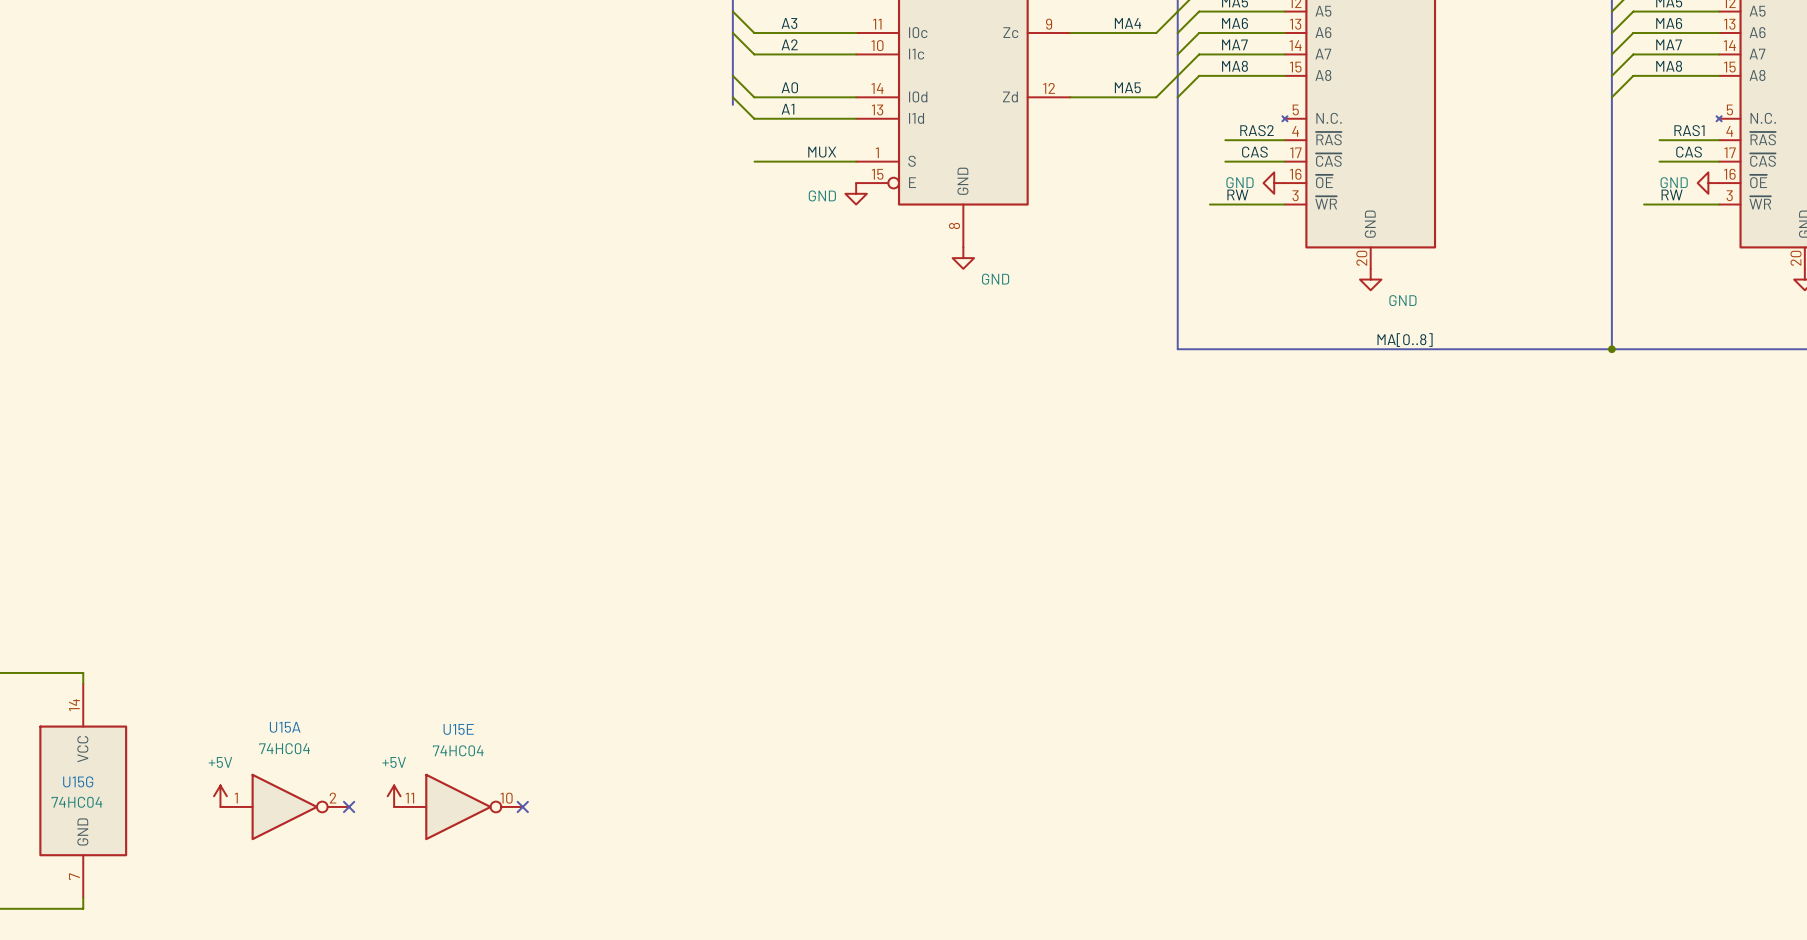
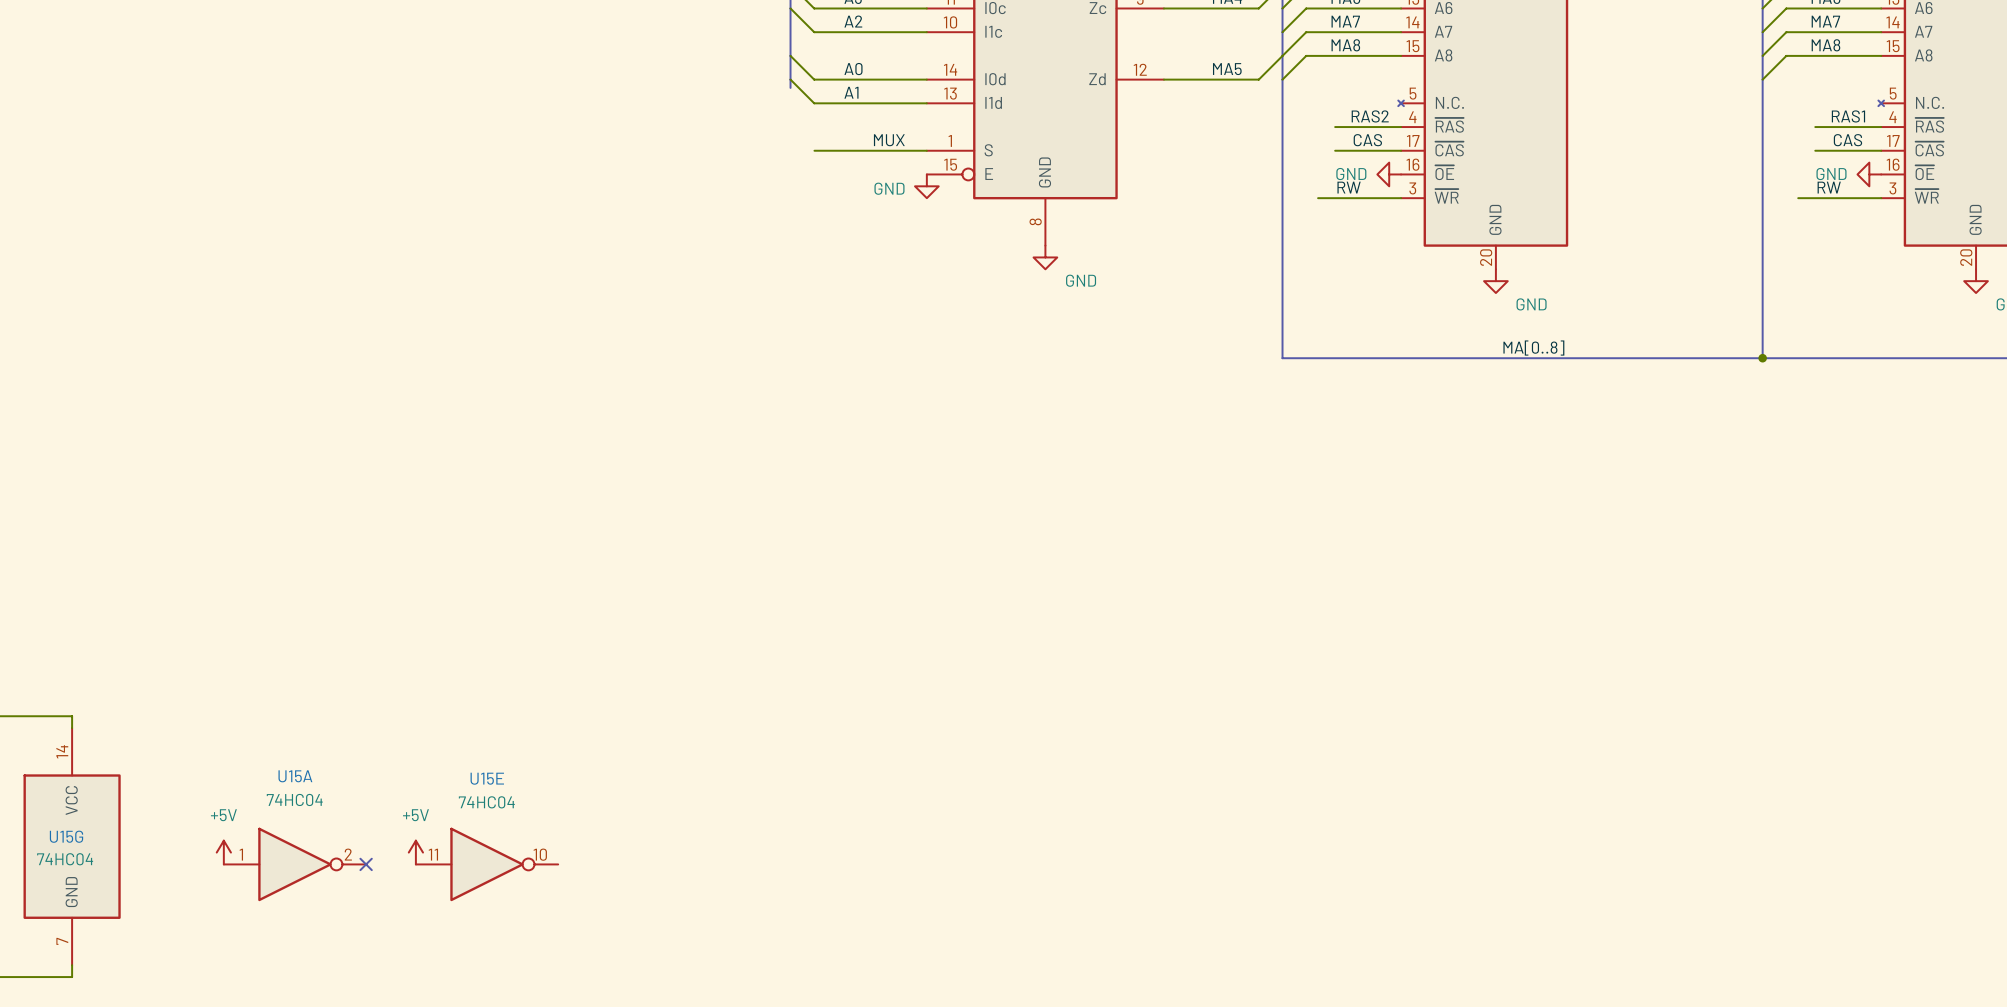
no-connect mark: (522, 806) -> none

